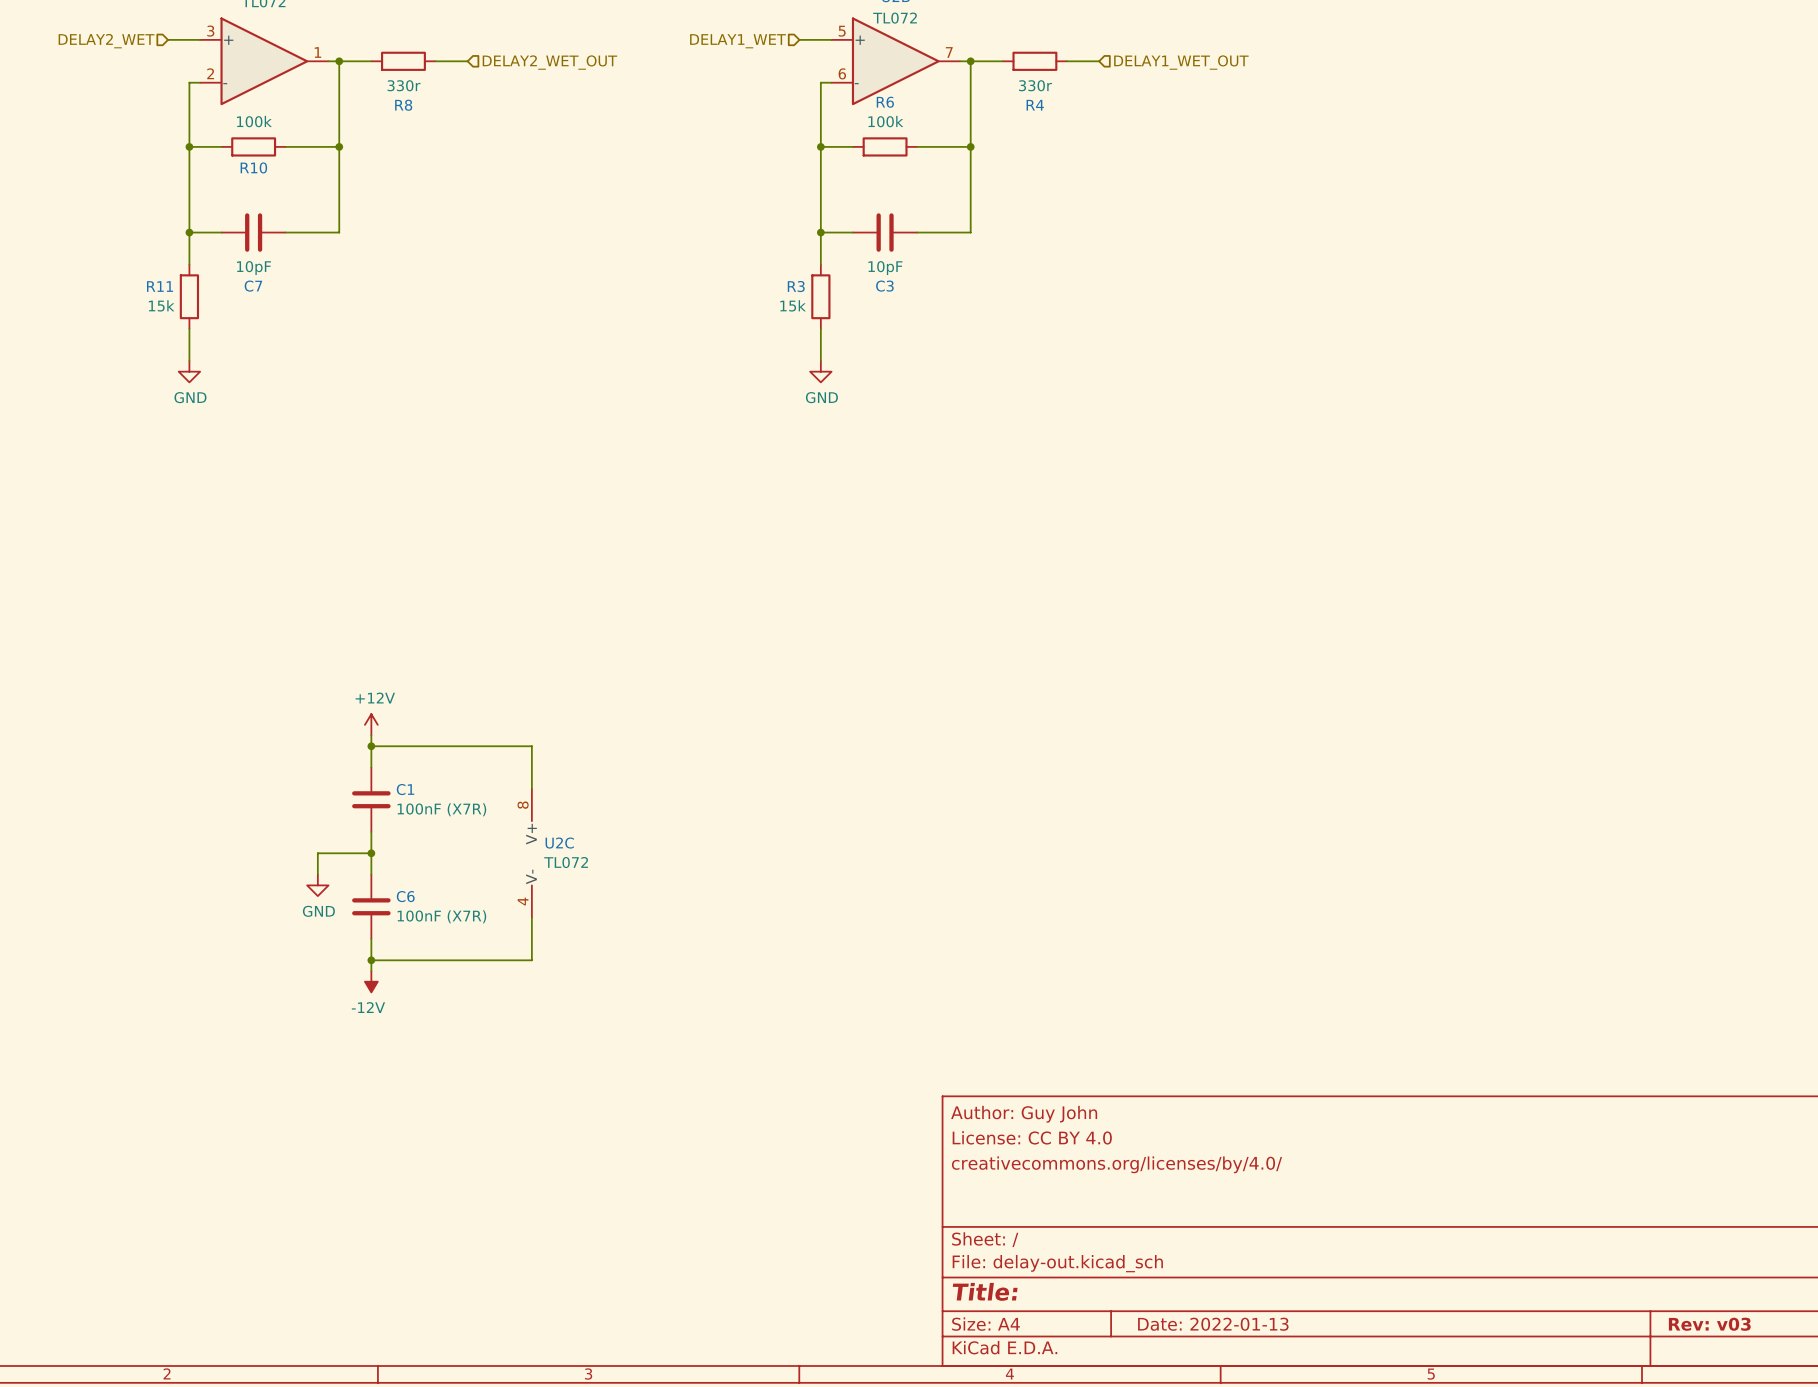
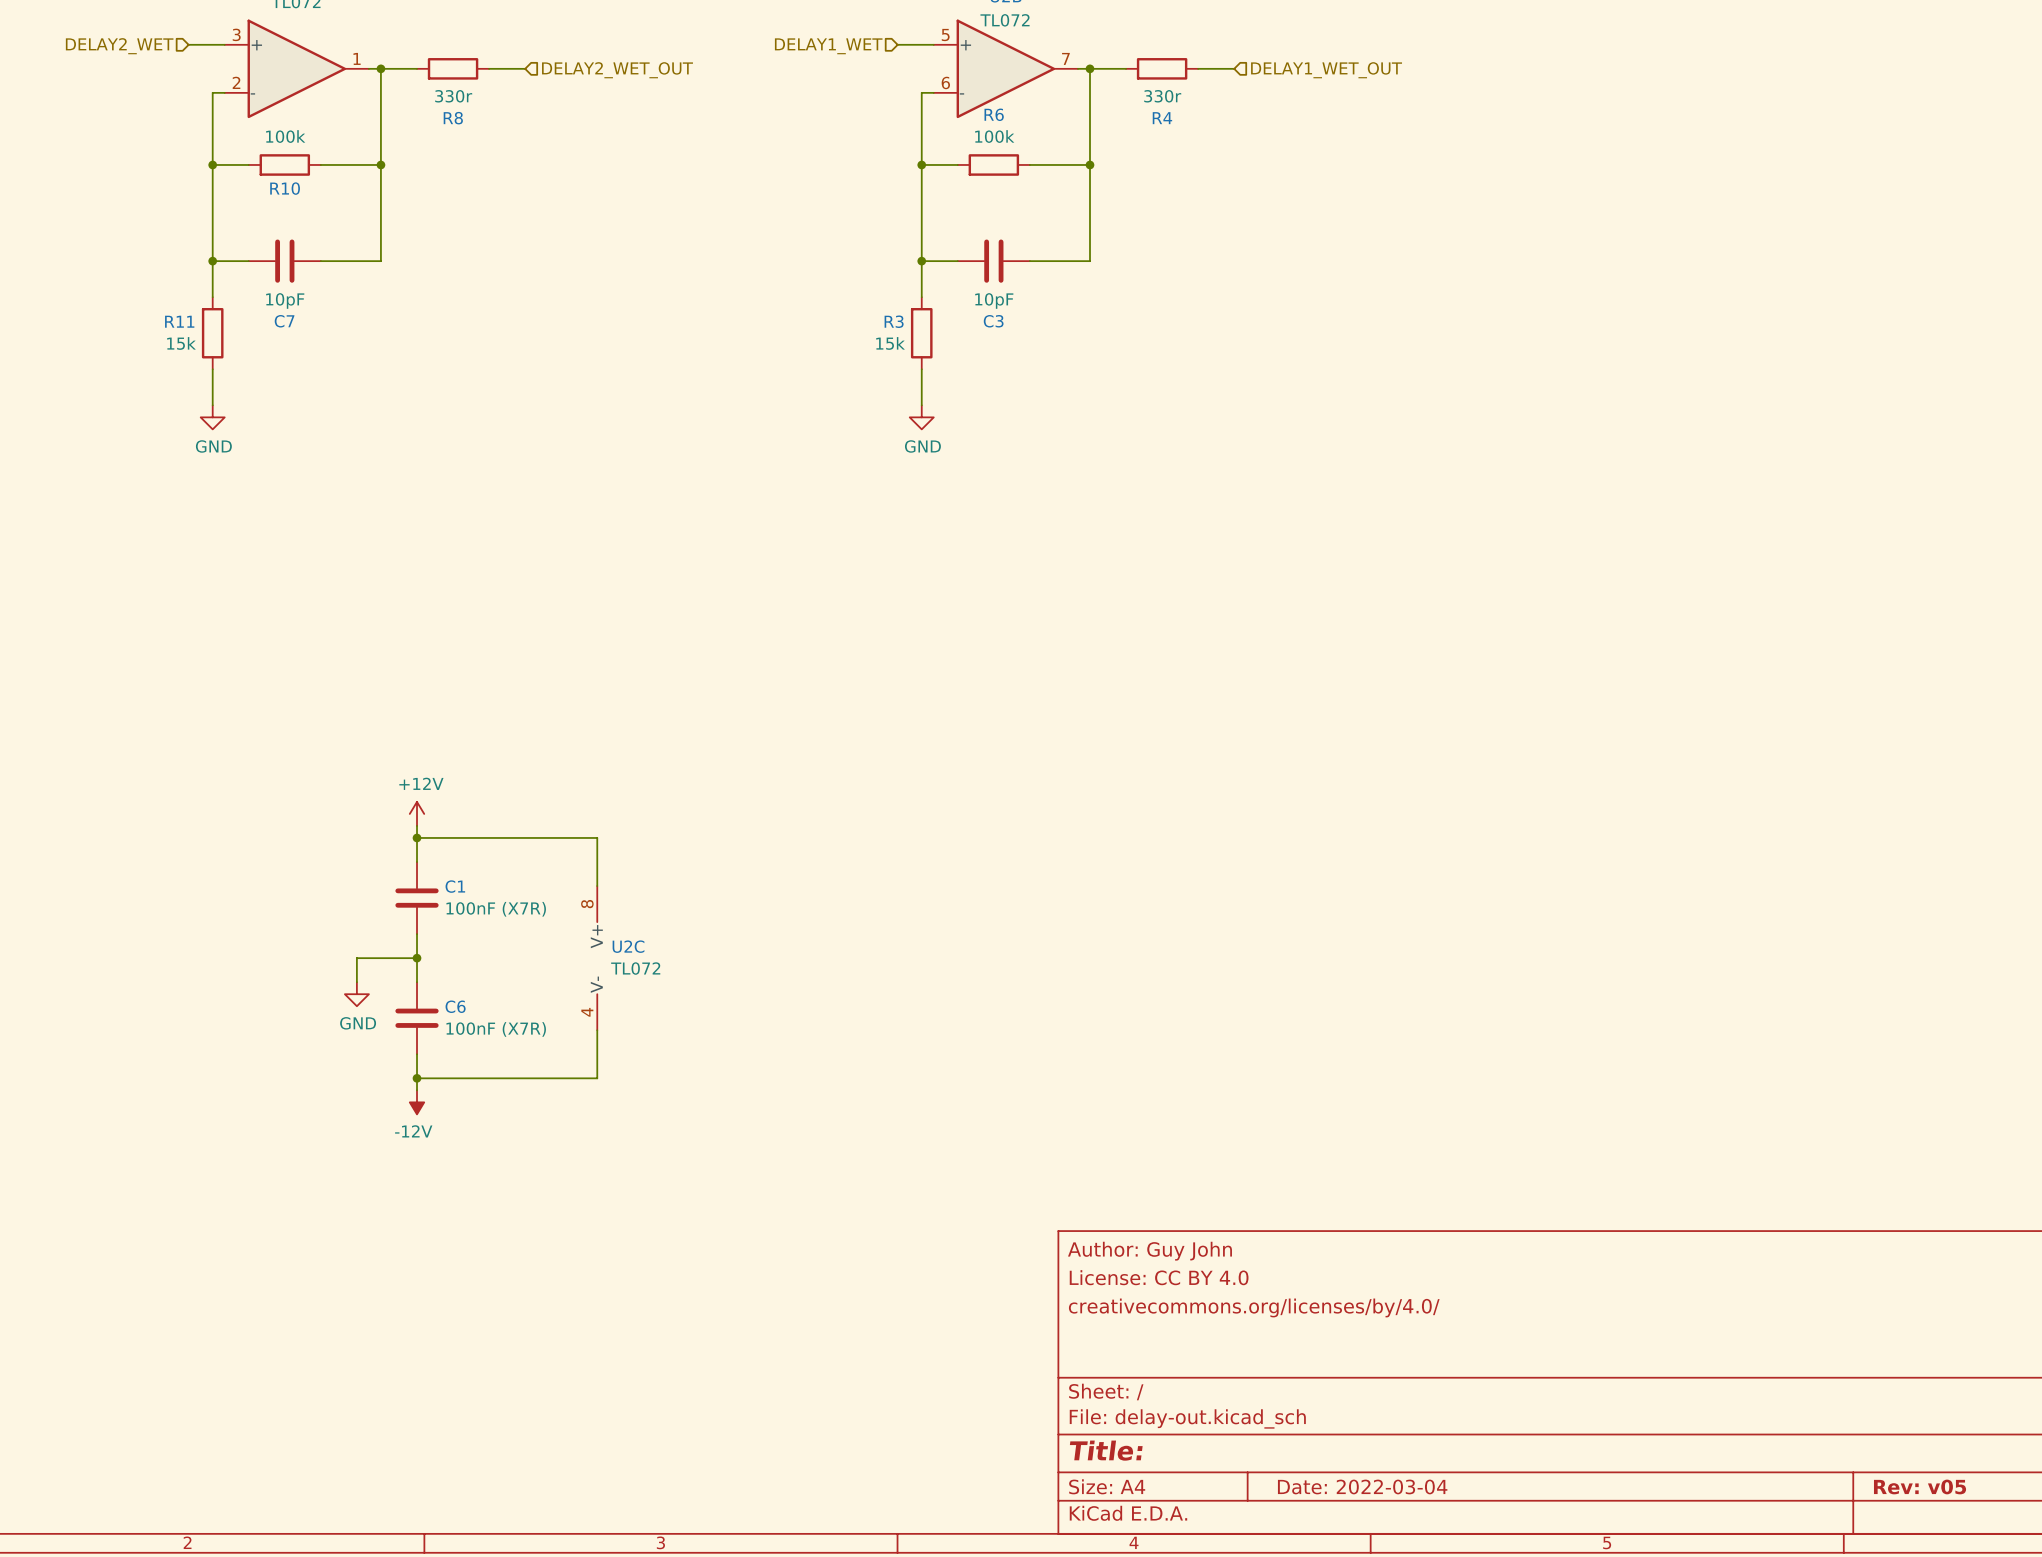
title block: Date: 2022-01-13 (1213, 1324) -> Date: 2022-03-04 (1362, 1486)
title block: Rev: v03 (1709, 1324) -> Rev: v05 (1920, 1486)

